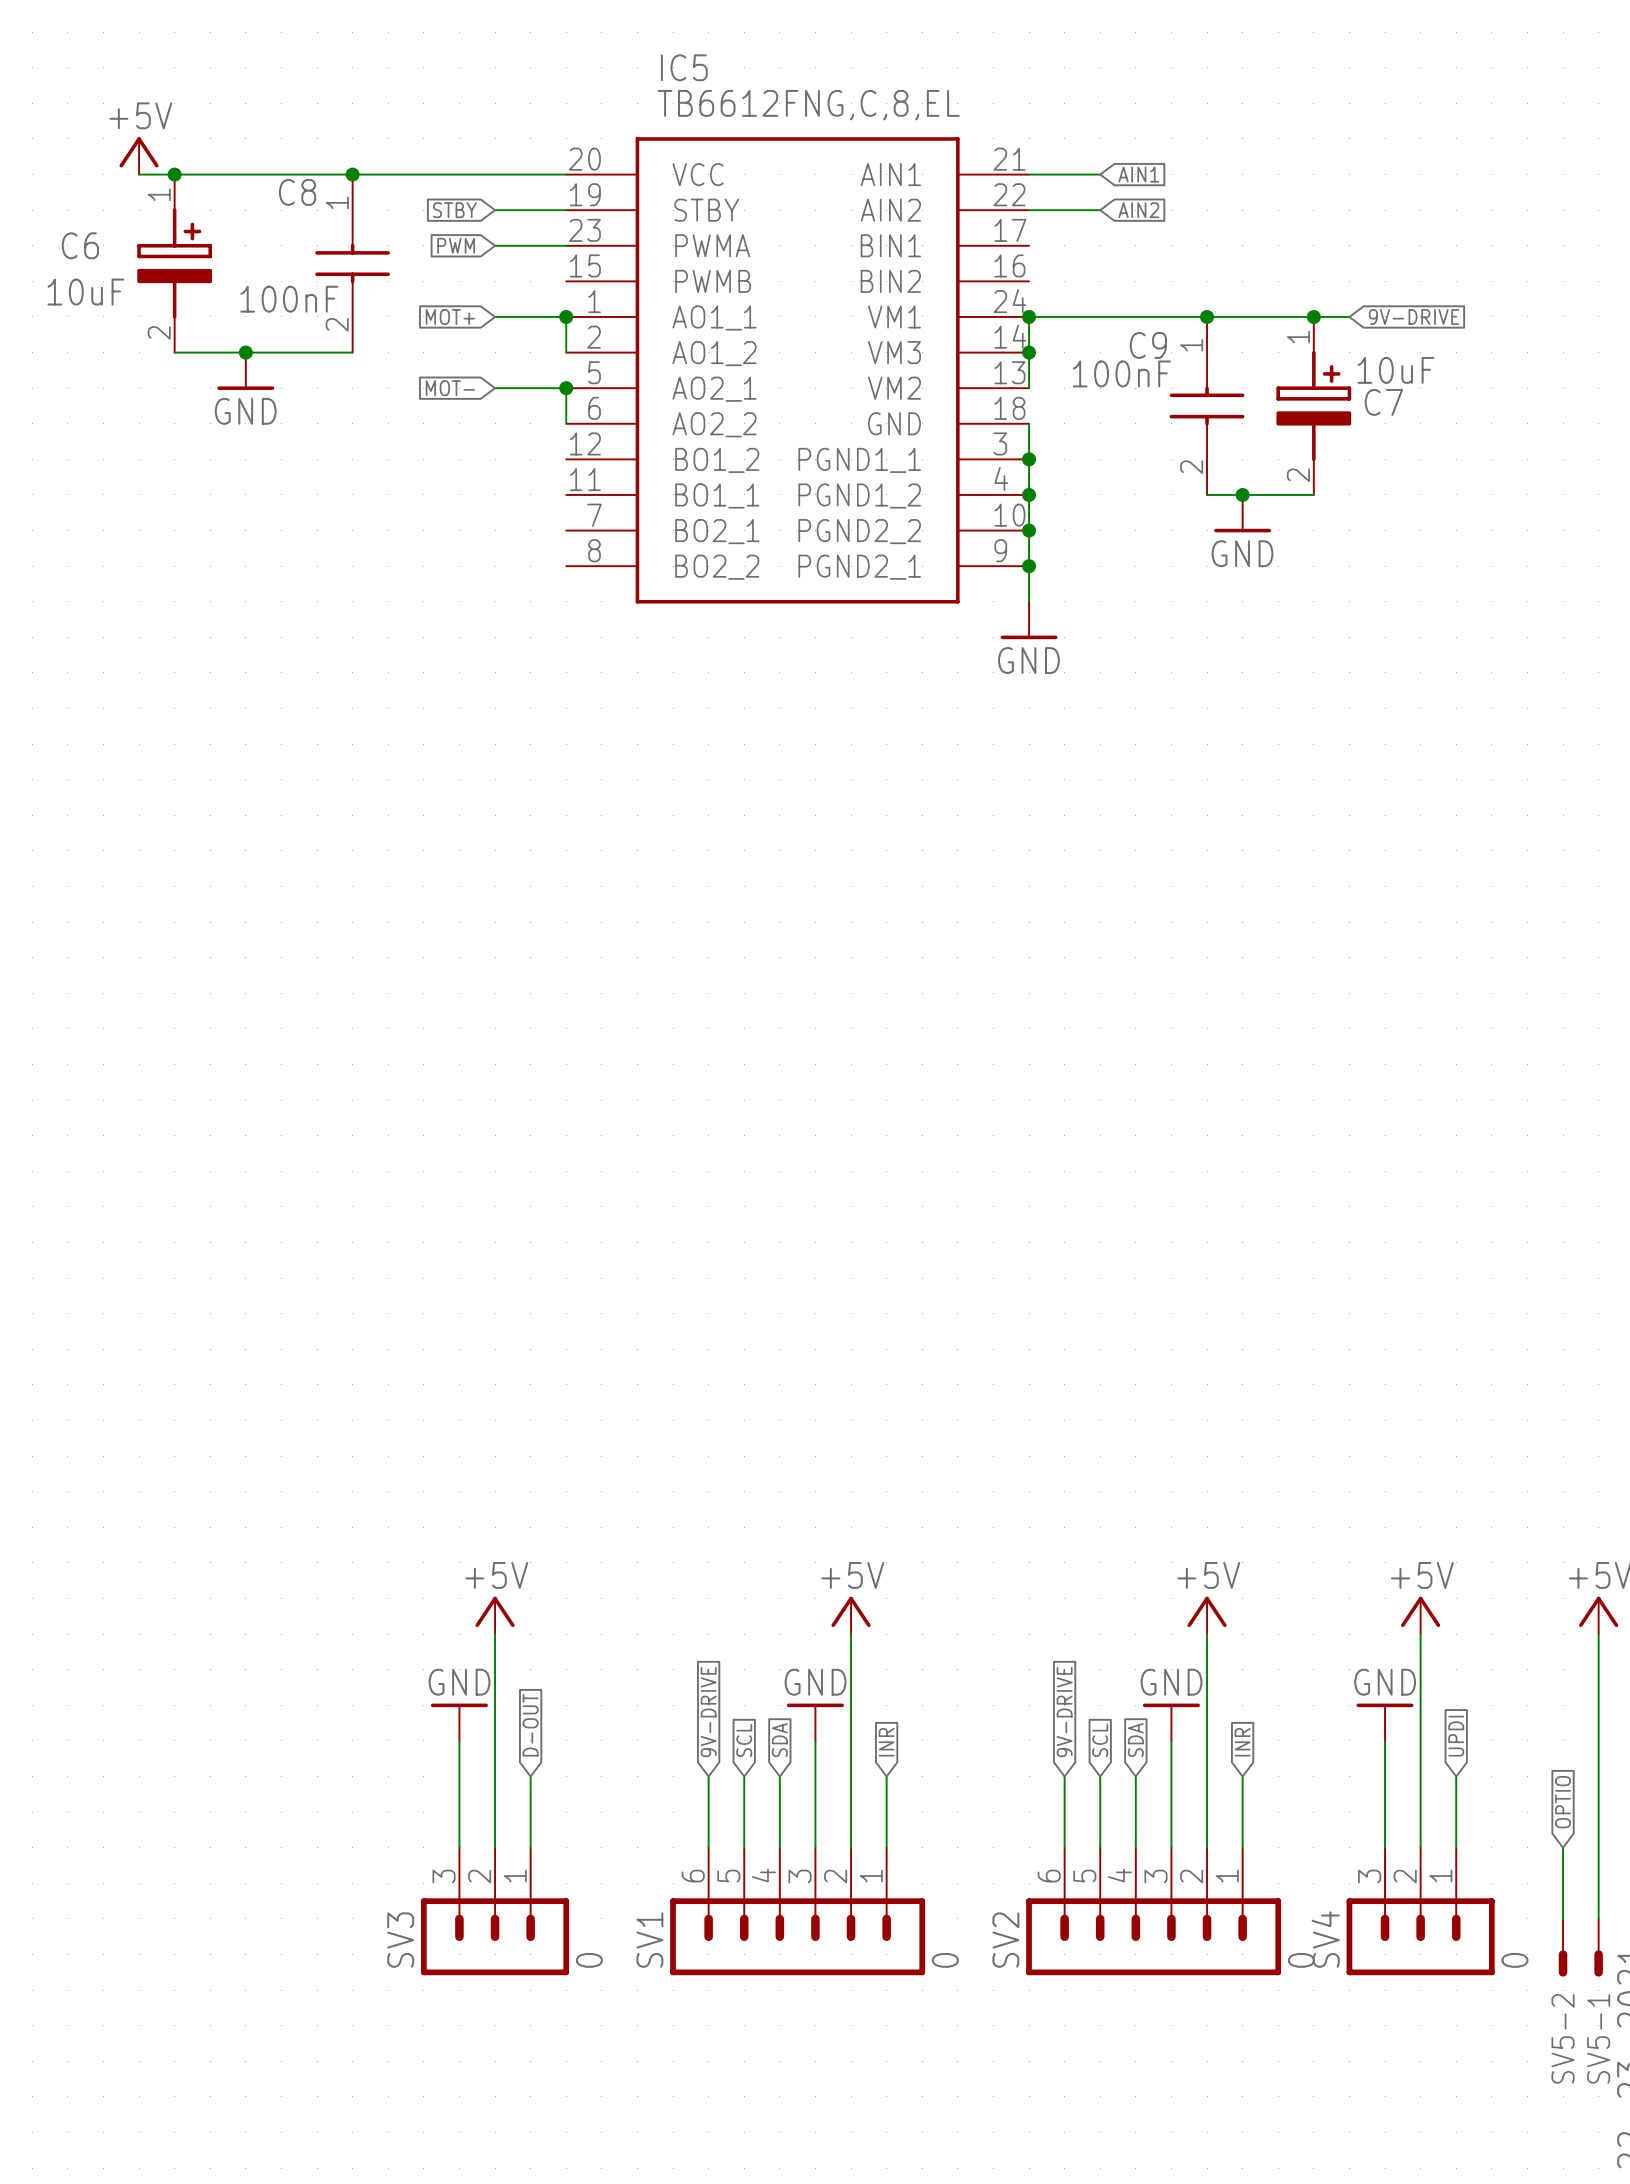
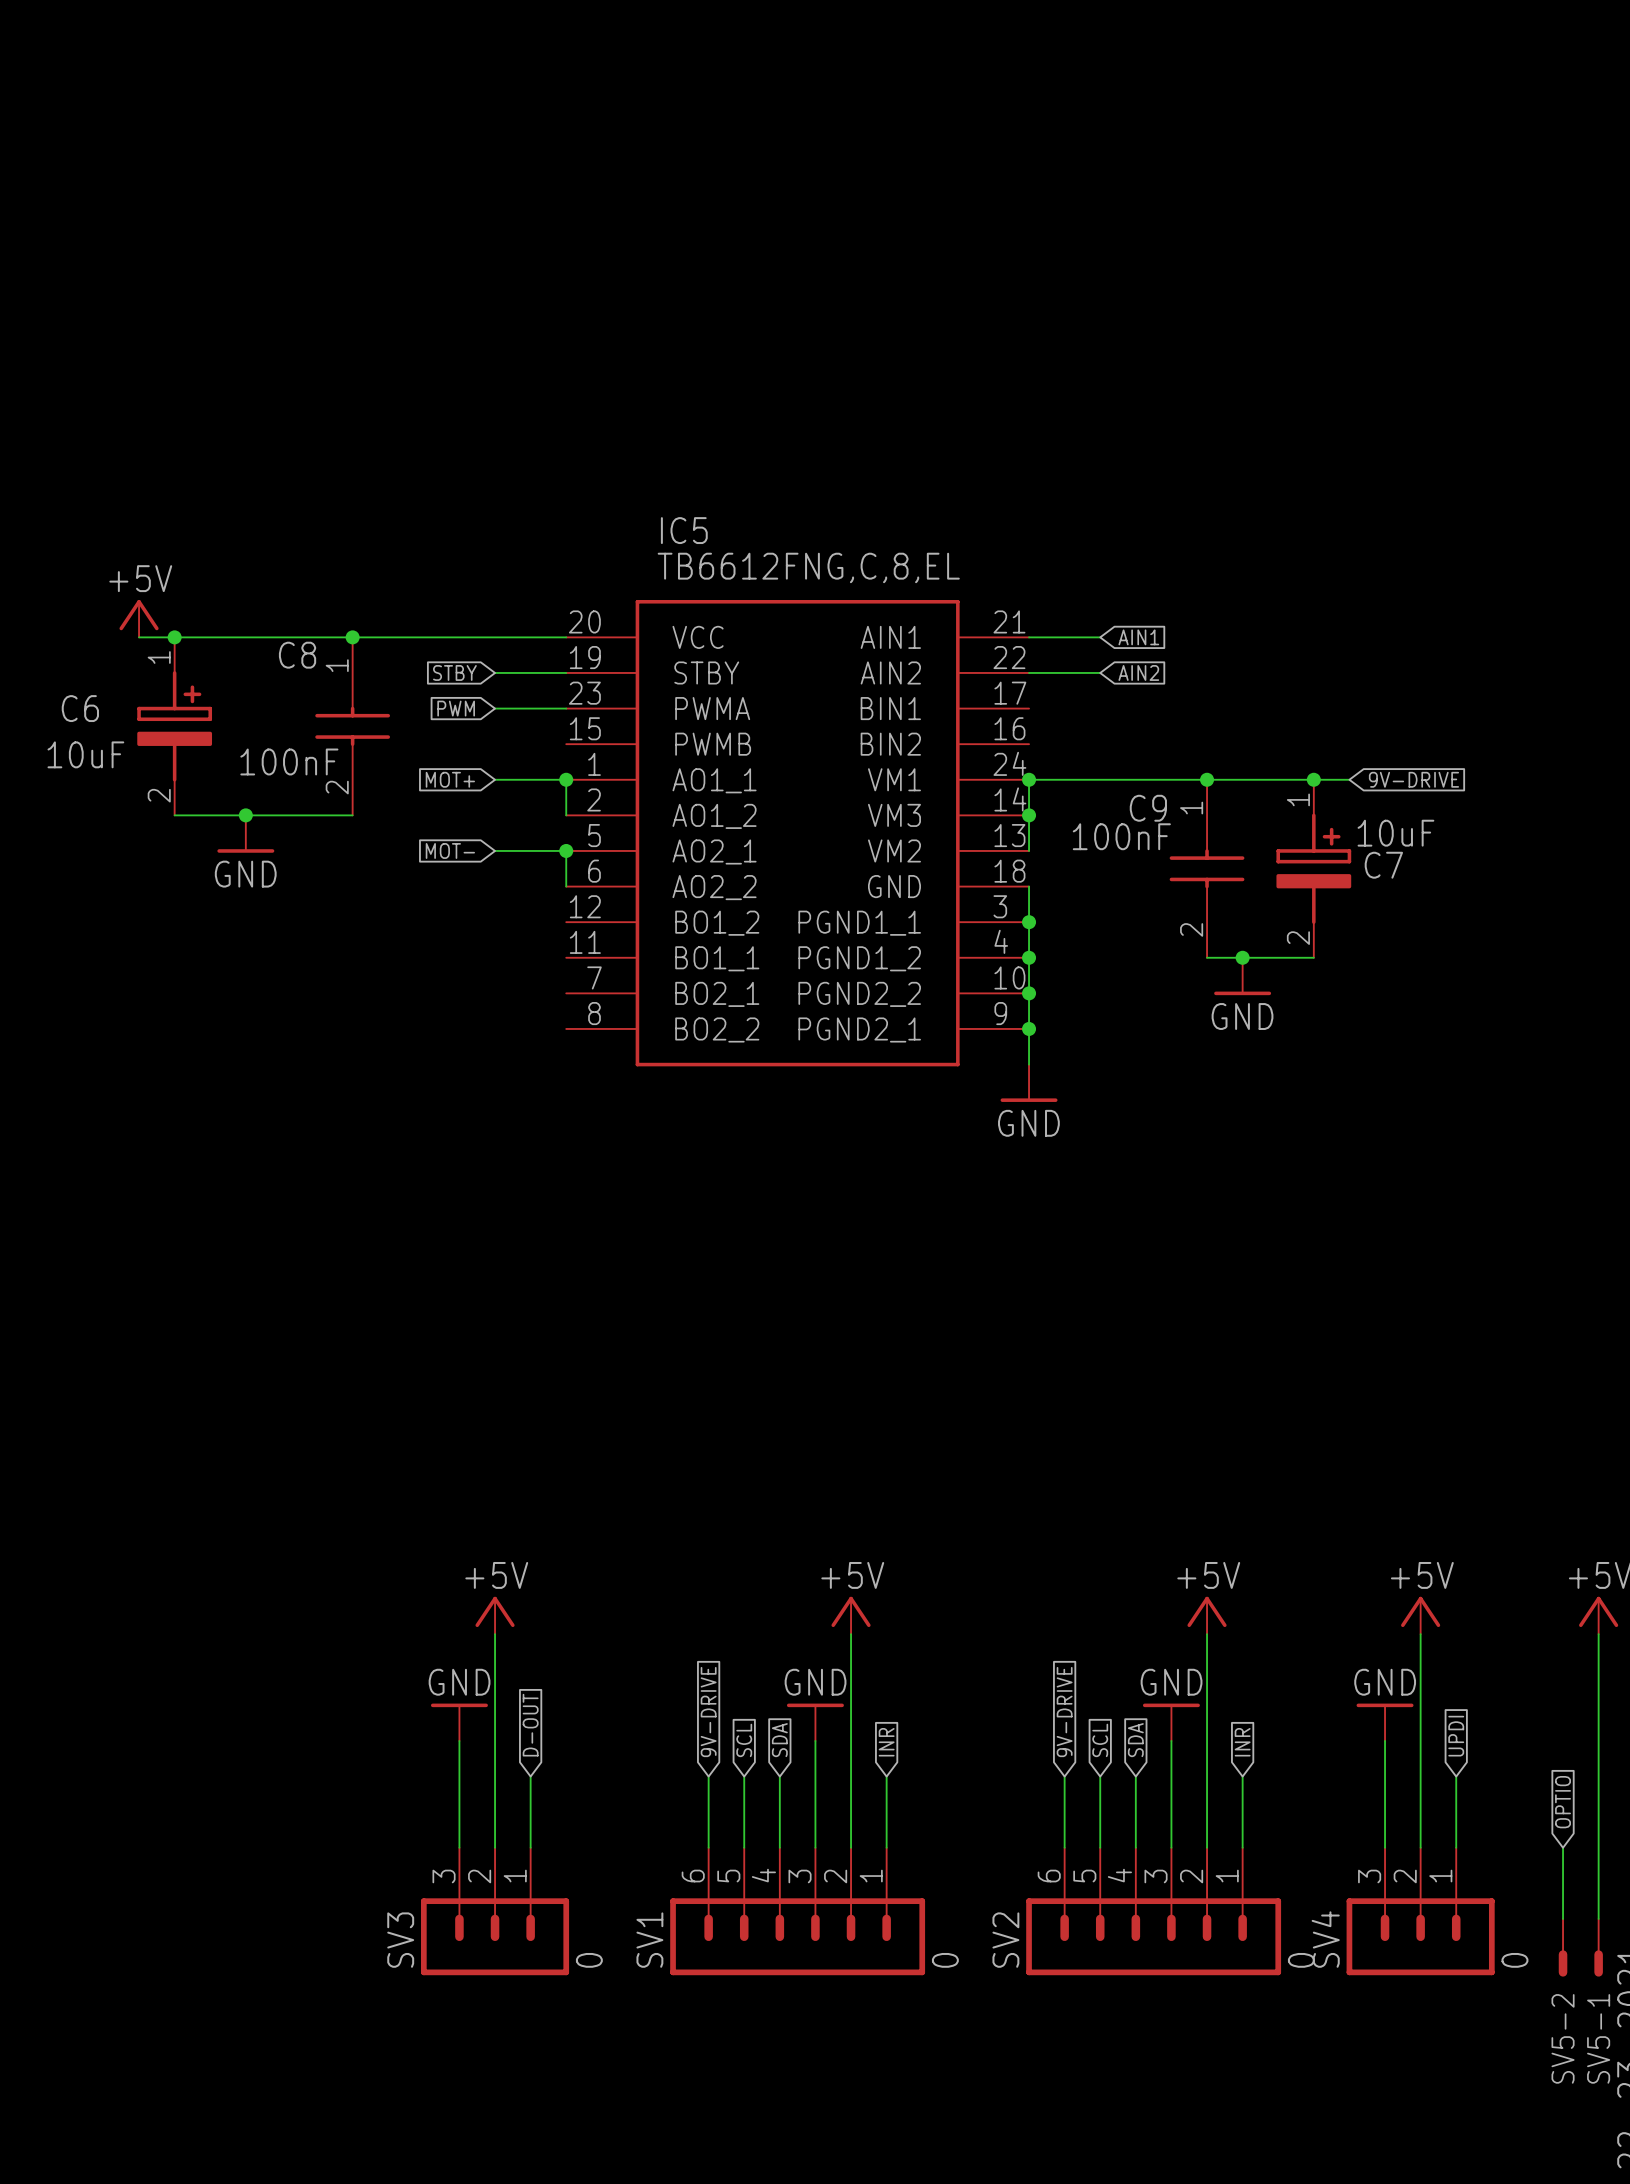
power symbol: +5V (139, 155) -> none
wire: (139, 174) (566, 174) -> none
junction: (174, 174) -> none
junction: (352, 174) -> none
wire: (1029, 174) (1100, 174) -> none
global label: AIN1 (1138, 174) -> none
global label: STBY (454, 210) -> none
wire: (495, 210) (566, 210) -> none
wire: (1029, 210) (1100, 210) -> none
global label: AIN2 (1138, 210) -> none
global label: PWM (456, 245) -> none
wire: (495, 245) (566, 245) -> none
C6 position: (174, 263) -> (174, 726)
C8 position: (352, 263) -> (352, 726)
global label: MOT+ (450, 316) -> none
wire: (495, 316) (566, 316) (566, 352) -> none
junction: (566, 316) -> none
junction: (1029, 316) -> none
junction: (1207, 316) -> none
junction: (1313, 316) -> none
wire: (1349, 316) (1029, 316) (1029, 388) -> none
global label: 9V-DRIVE (1413, 316) -> none
wire: (174, 352) (352, 352) -> none
junction: (245, 352) -> none
junction: (1029, 352) -> none
IC5 position: (797, 370) -> (797, 833)
power symbol: GND (245, 371) -> none
global label: MOT- (450, 388) -> none
wire: (495, 388) (566, 388) (566, 423) -> none
junction: (566, 388) -> none
C9 position: (1207, 405) -> (1207, 868)
C7 position: (1313, 405) -> (1313, 868)
wire: (1029, 423) (1029, 601) -> none
junction: (1029, 459) -> none
junction: (1029, 494) -> none
wire: (1207, 494) (1313, 494) -> none
junction: (1242, 494) -> none
power symbol: GND (1242, 513) -> none
junction: (1029, 530) -> none
junction: (1029, 566) -> none
power symbol: none -> +5V (139, 618)
power symbol: GND (1029, 620) -> none
wire: none -> (139, 637) (566, 637)
junction: none -> (174, 637)
junction: none -> (352, 637)
wire: none -> (1029, 637) (1100, 637)
global label: none -> AIN1 (1138, 637)
global label: none -> STBY (454, 672)
wire: none -> (495, 672) (566, 672)
wire: none -> (1029, 672) (1100, 672)
global label: none -> AIN2 (1138, 672)
global label: none -> PWM (456, 708)
wire: none -> (495, 708) (566, 708)
global label: none -> MOT+ (450, 779)
wire: none -> (495, 779) (566, 779) (566, 815)
junction: none -> (566, 779)
junction: none -> (1029, 779)
junction: none -> (1207, 779)
junction: none -> (1313, 779)
wire: none -> (1349, 779) (1029, 779) (1029, 850)
global label: none -> 9V-DRIVE (1413, 779)
wire: none -> (174, 815) (352, 815)
junction: none -> (245, 815)
junction: none -> (1029, 815)
power symbol: none -> GND (245, 834)
global label: none -> MOT- (450, 850)
wire: none -> (495, 850) (566, 850) (566, 886)
junction: none -> (566, 850)
wire: none -> (1029, 886) (1029, 1064)
junction: none -> (1029, 922)
junction: none -> (1029, 957)
wire: none -> (1207, 957) (1313, 957)
junction: none -> (1242, 957)
power symbol: none -> GND (1242, 976)
junction: none -> (1029, 993)
junction: none -> (1029, 1028)
power symbol: none -> GND (1029, 1083)

